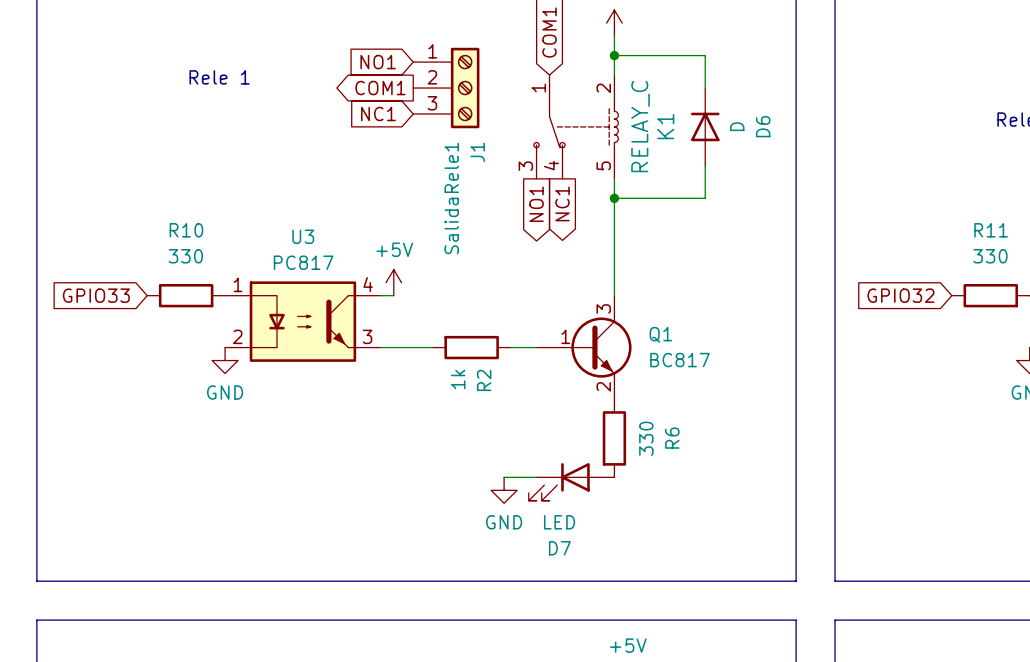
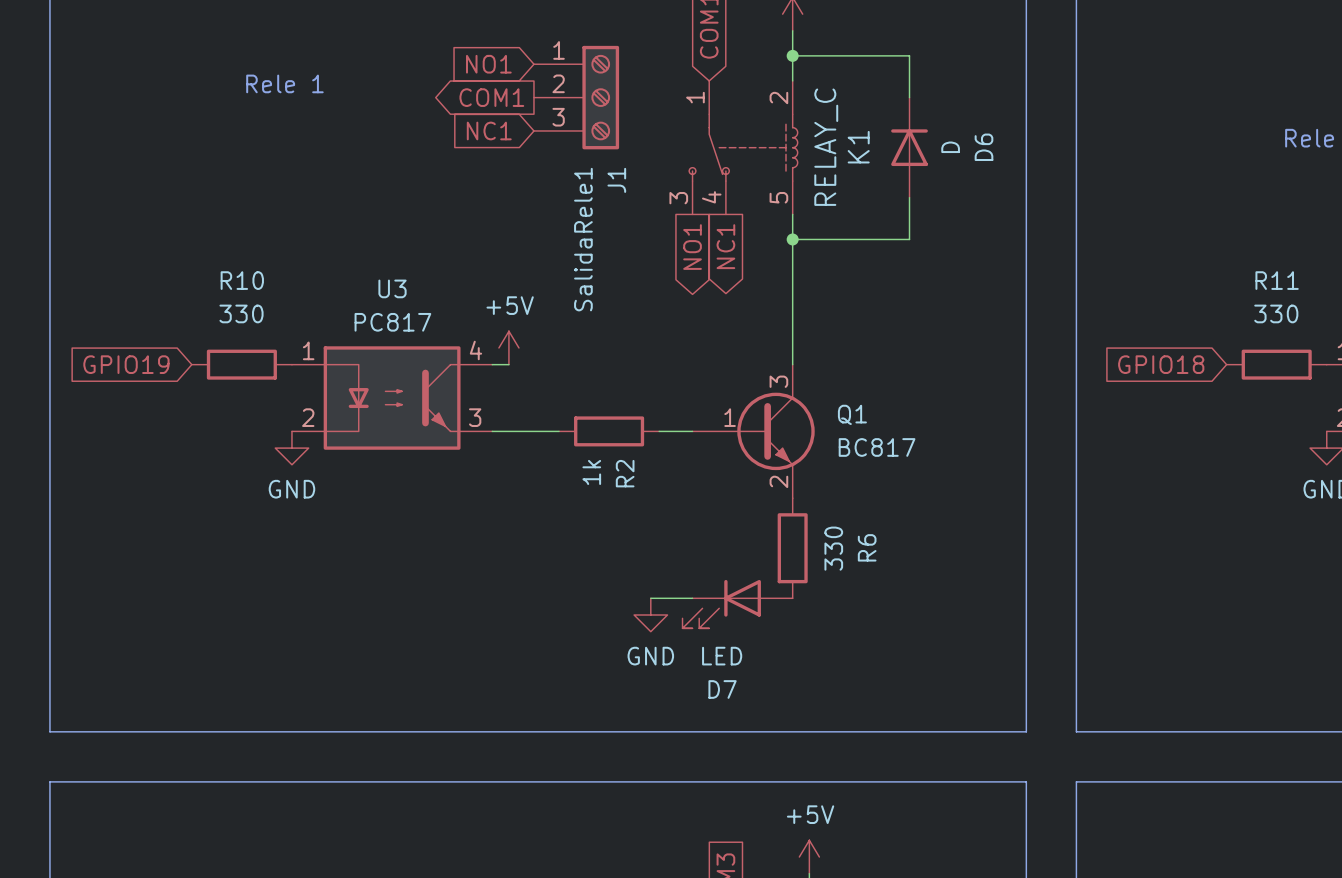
global label: GPIO33 (96, 295) -> GPIO19 (126, 364)
global label: GPIO32 (900, 295) -> GPIO18 (1161, 364)

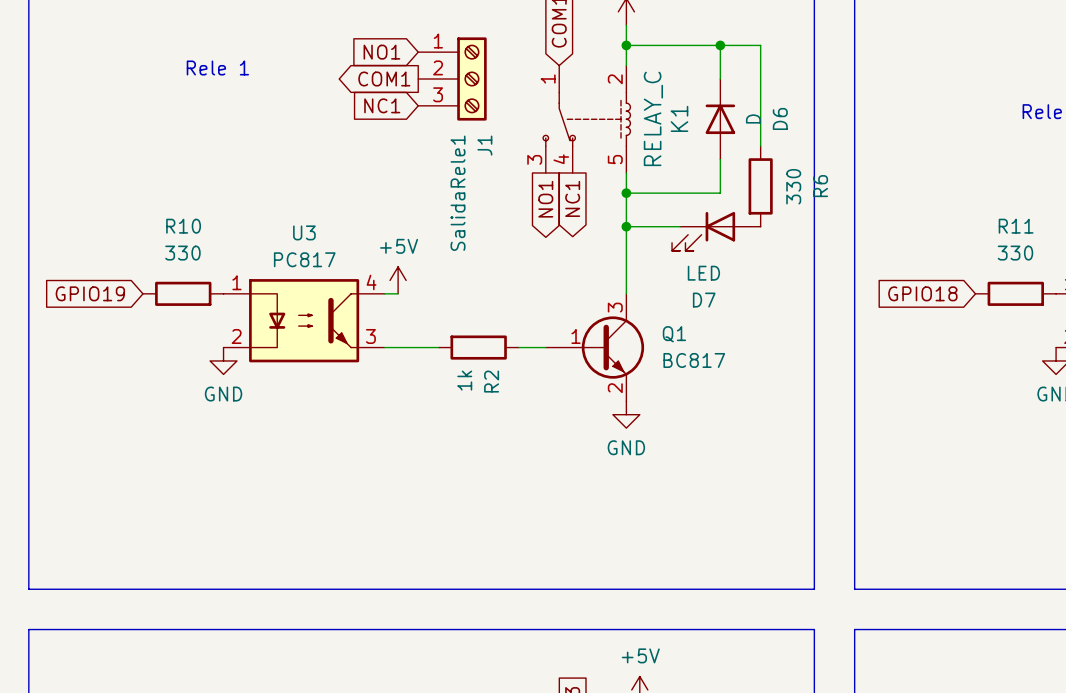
wire: none -> (720, 45) (760, 45) (760, 146)
junction: none -> (720, 45)
wire: none -> (626, 226) (680, 226)
junction: none -> (626, 226)
R6 position: (792, 548) -> (760, 186)
wire: (650, 598) (692, 598) -> none
D7 position: (737, 604) -> (716, 231)
power symbol position: GND (650, 615) -> GND (626, 414)

